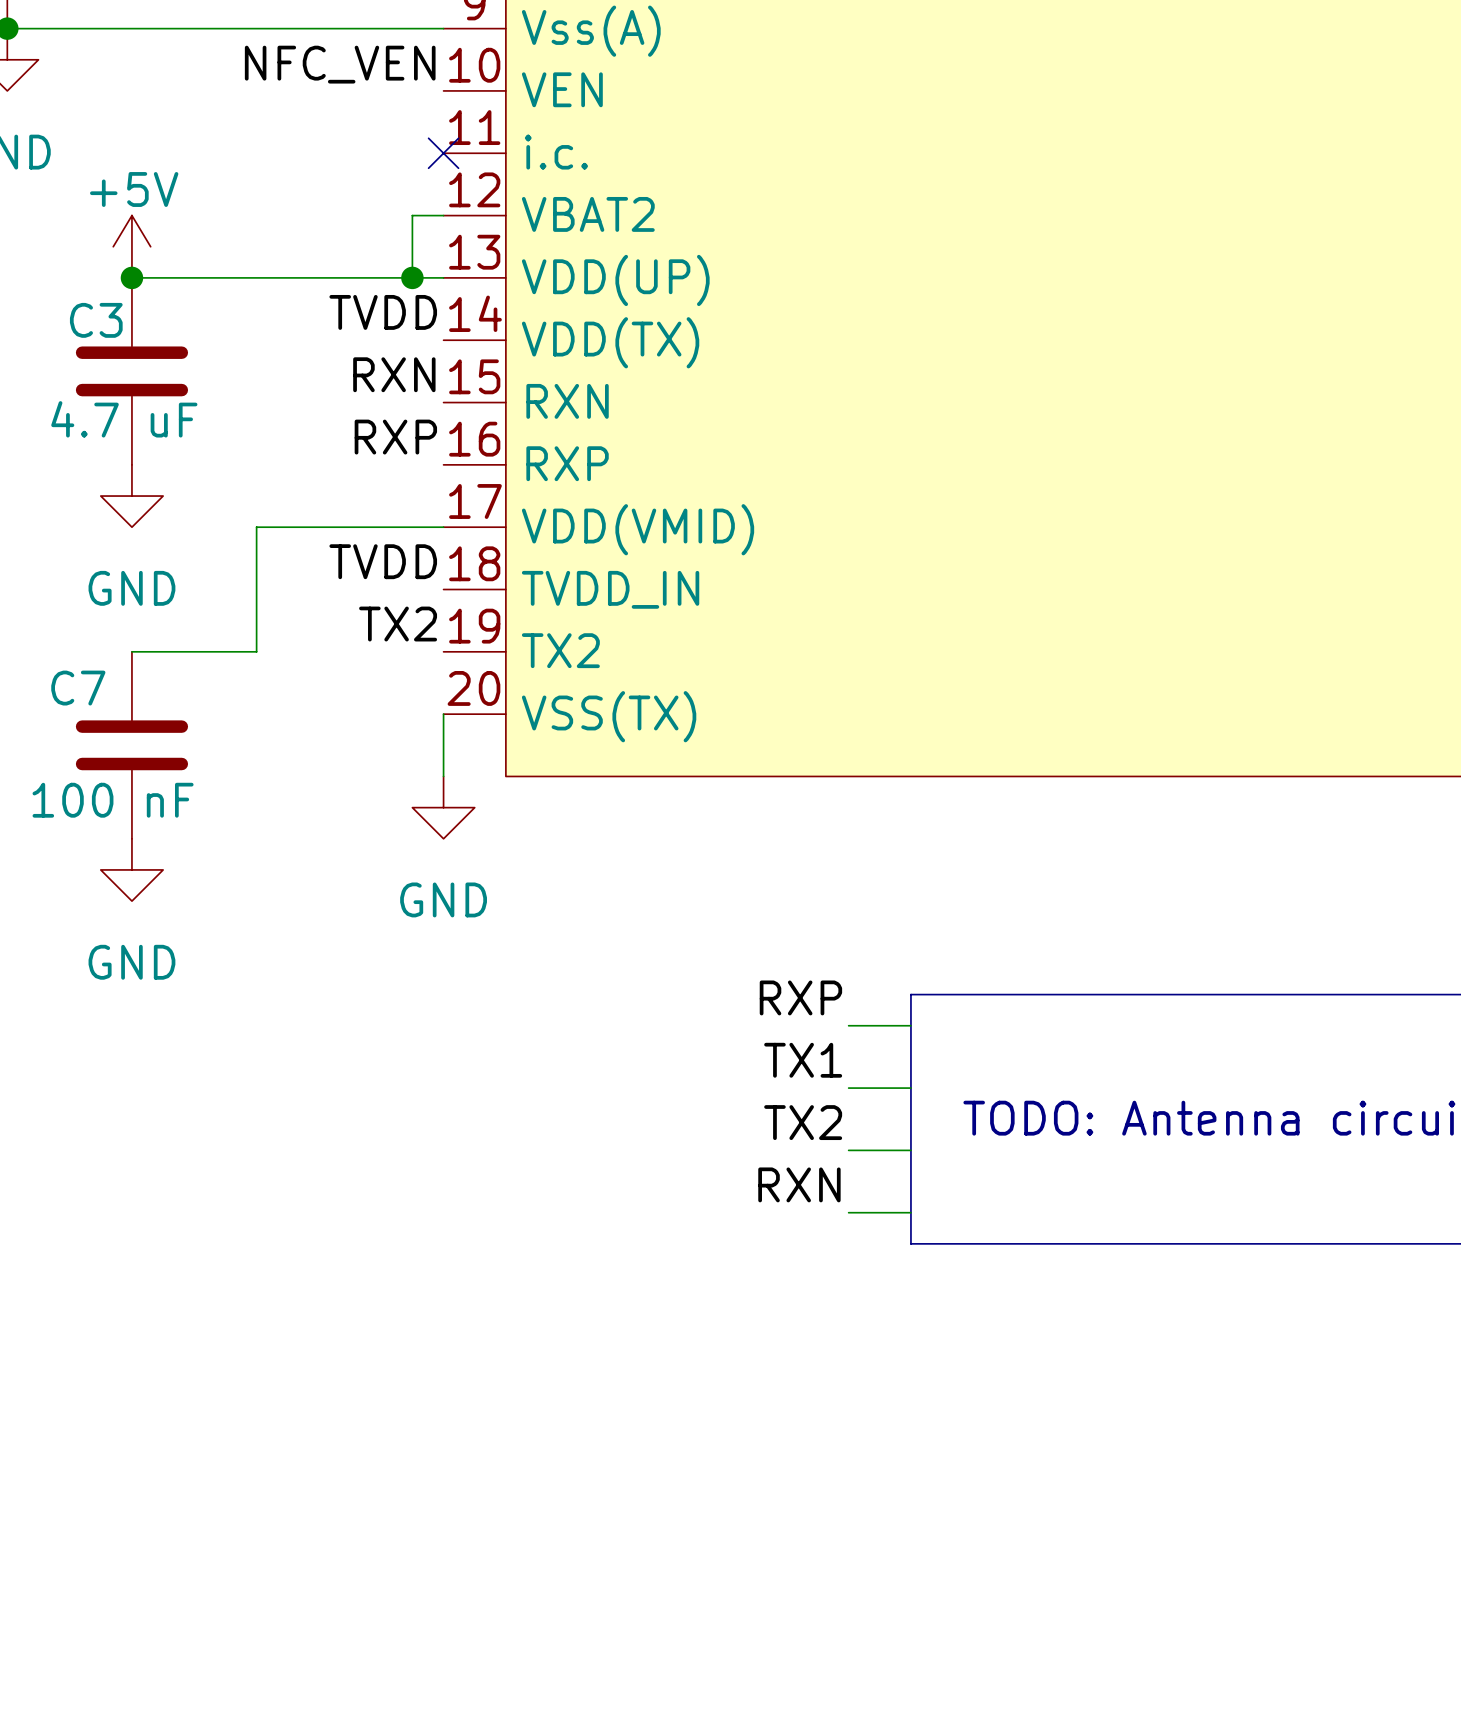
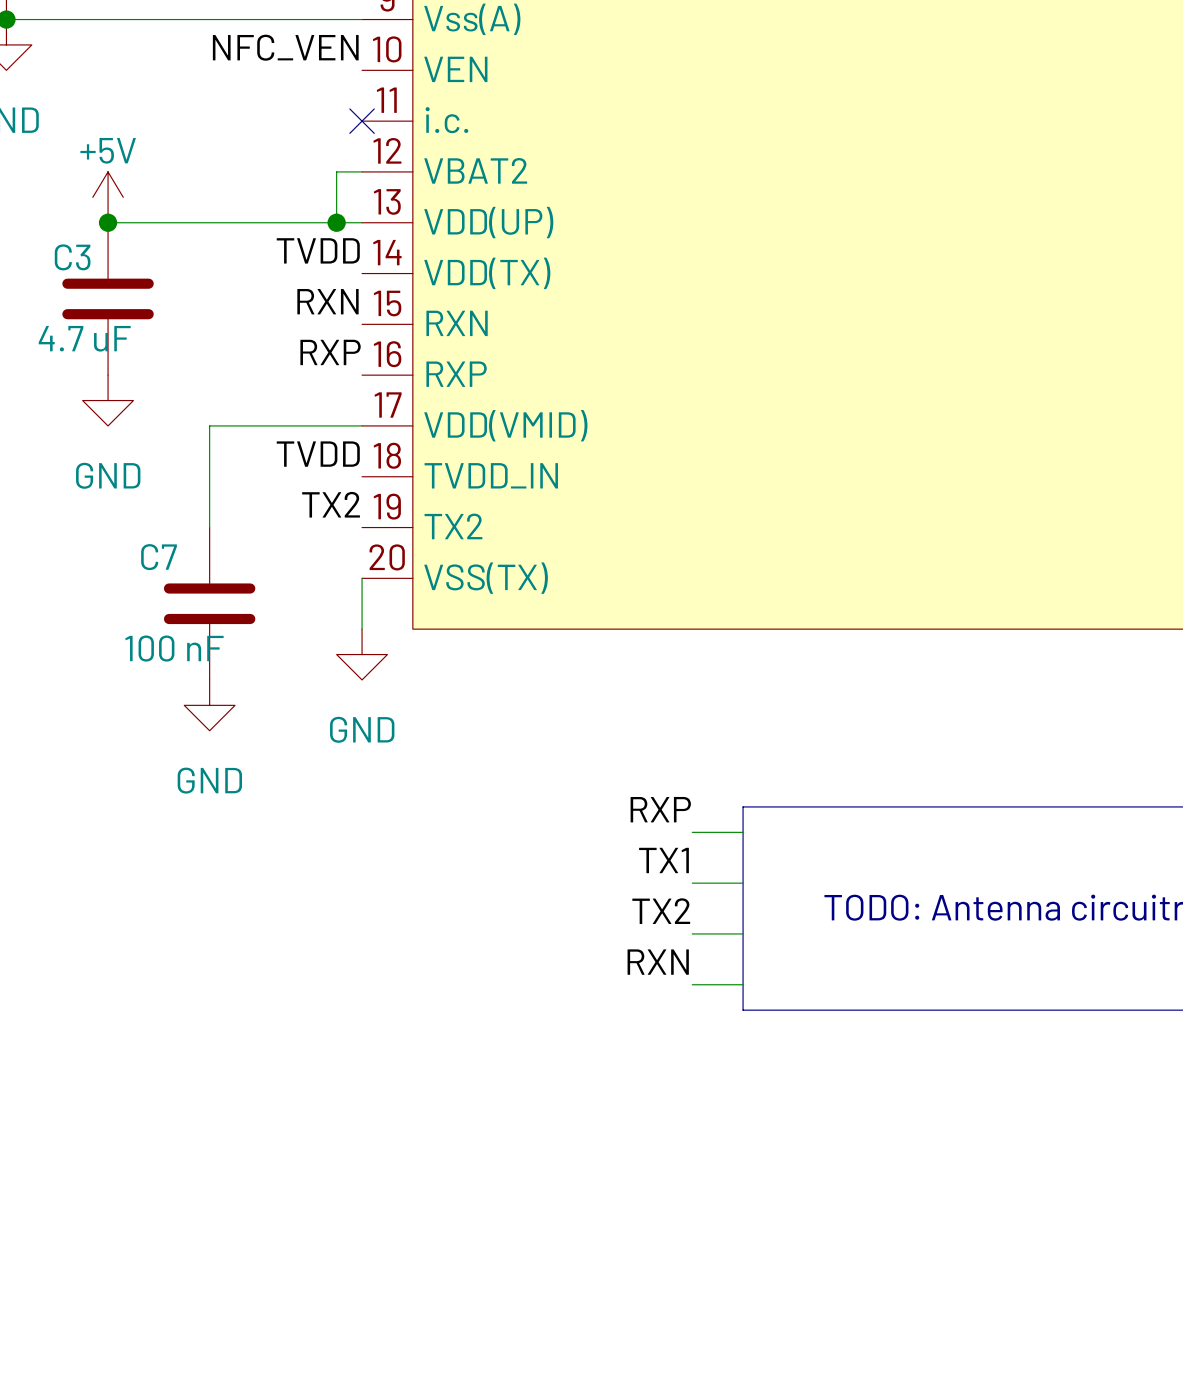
wire: (131, 651) (256, 651) -> none
C7 position: (131, 745) -> (209, 603)
power symbol position: GND (131, 869) -> GND (209, 705)

